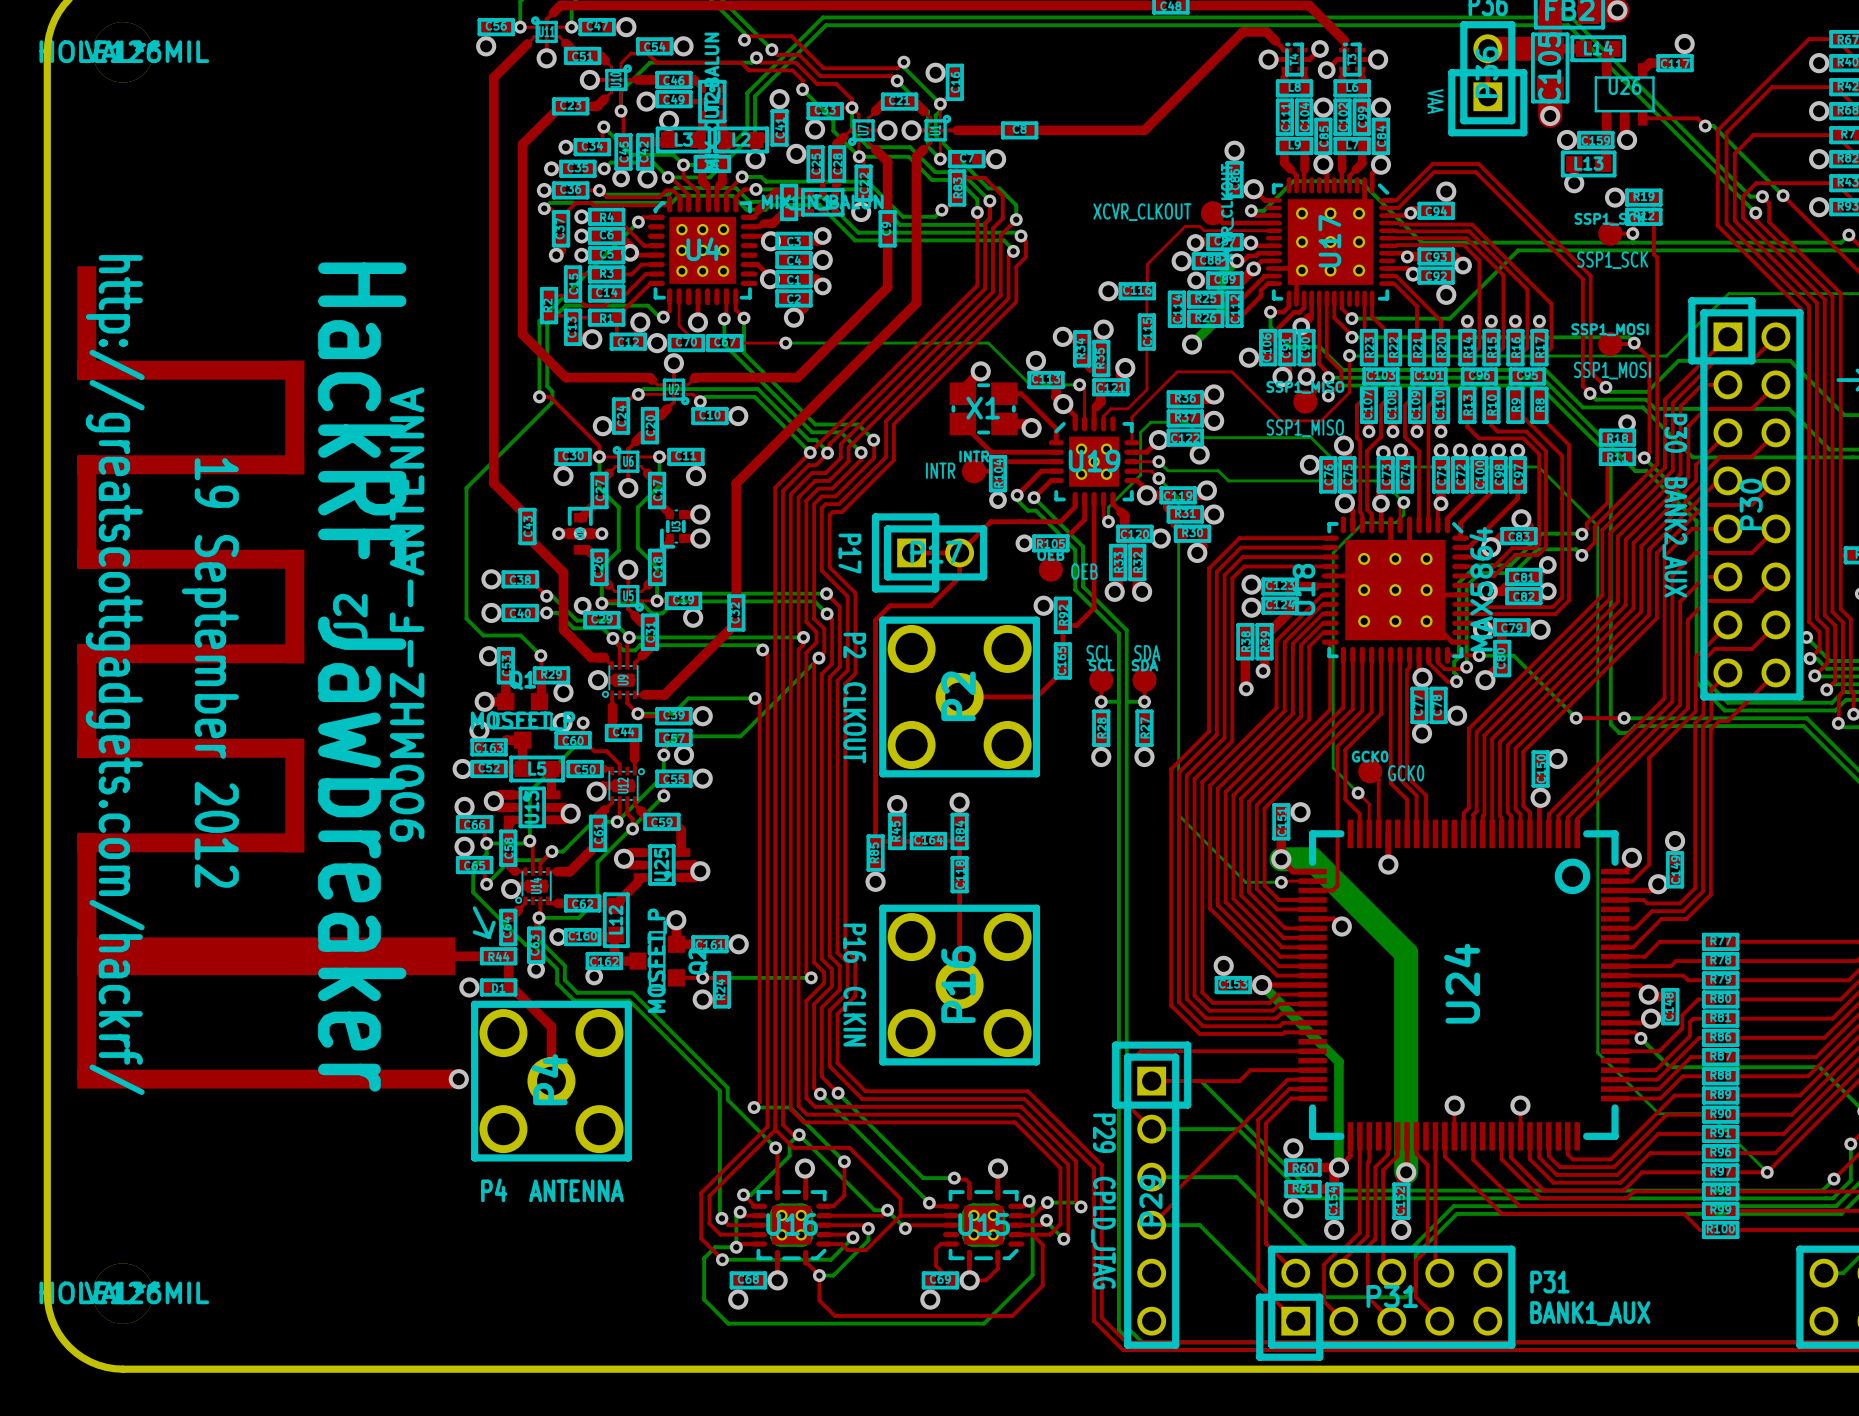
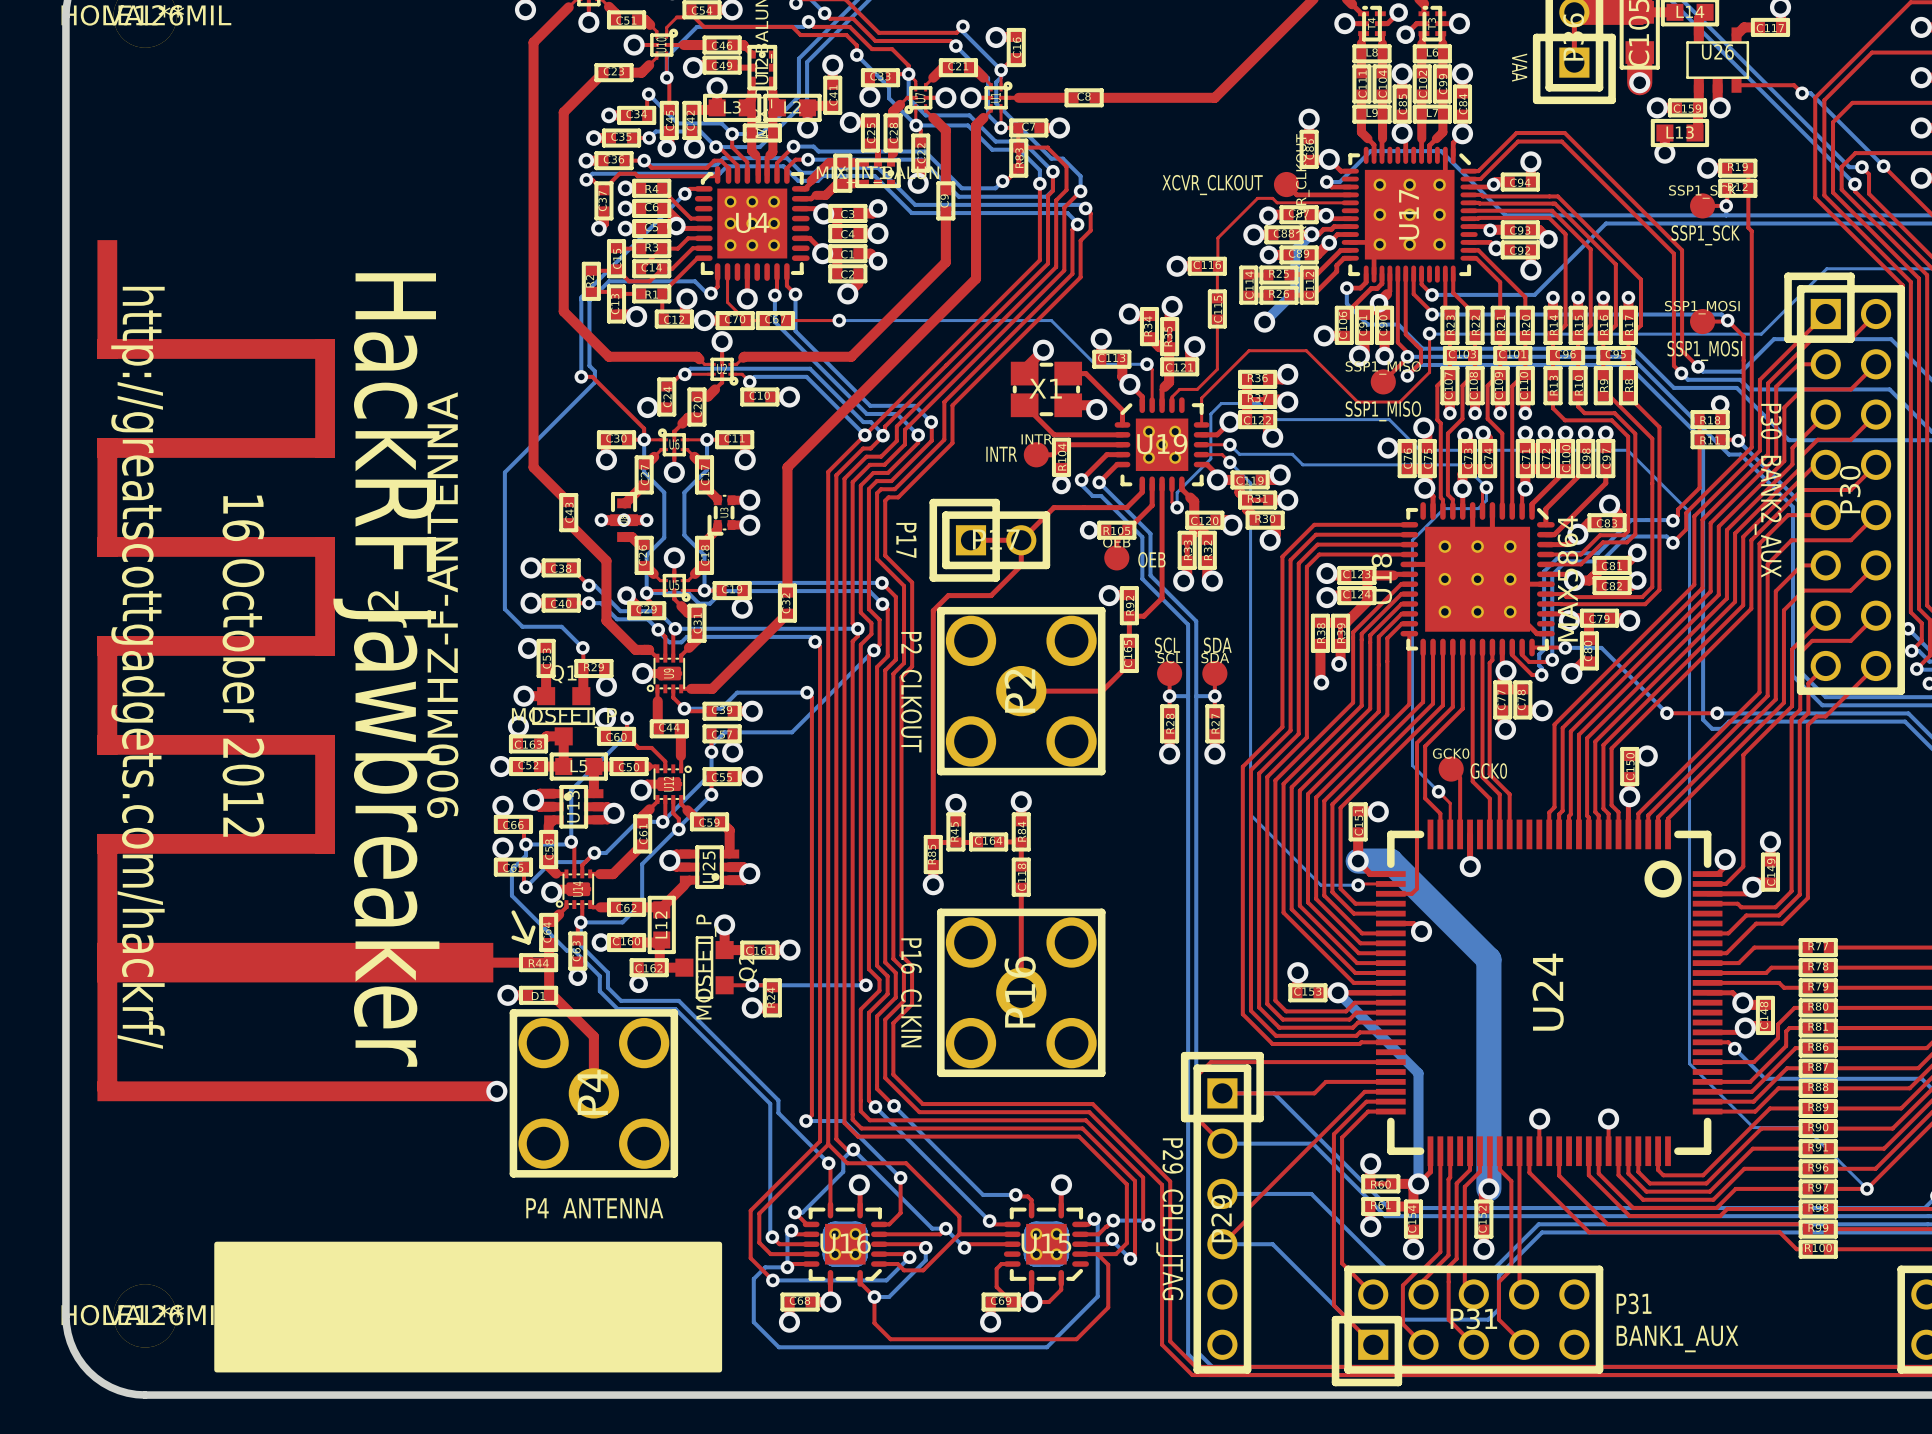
text: 19 September 2012 (210, 672) -> 16 October 2012 (243, 666)
drawing: none -> [214, 1241, 723, 1373]

